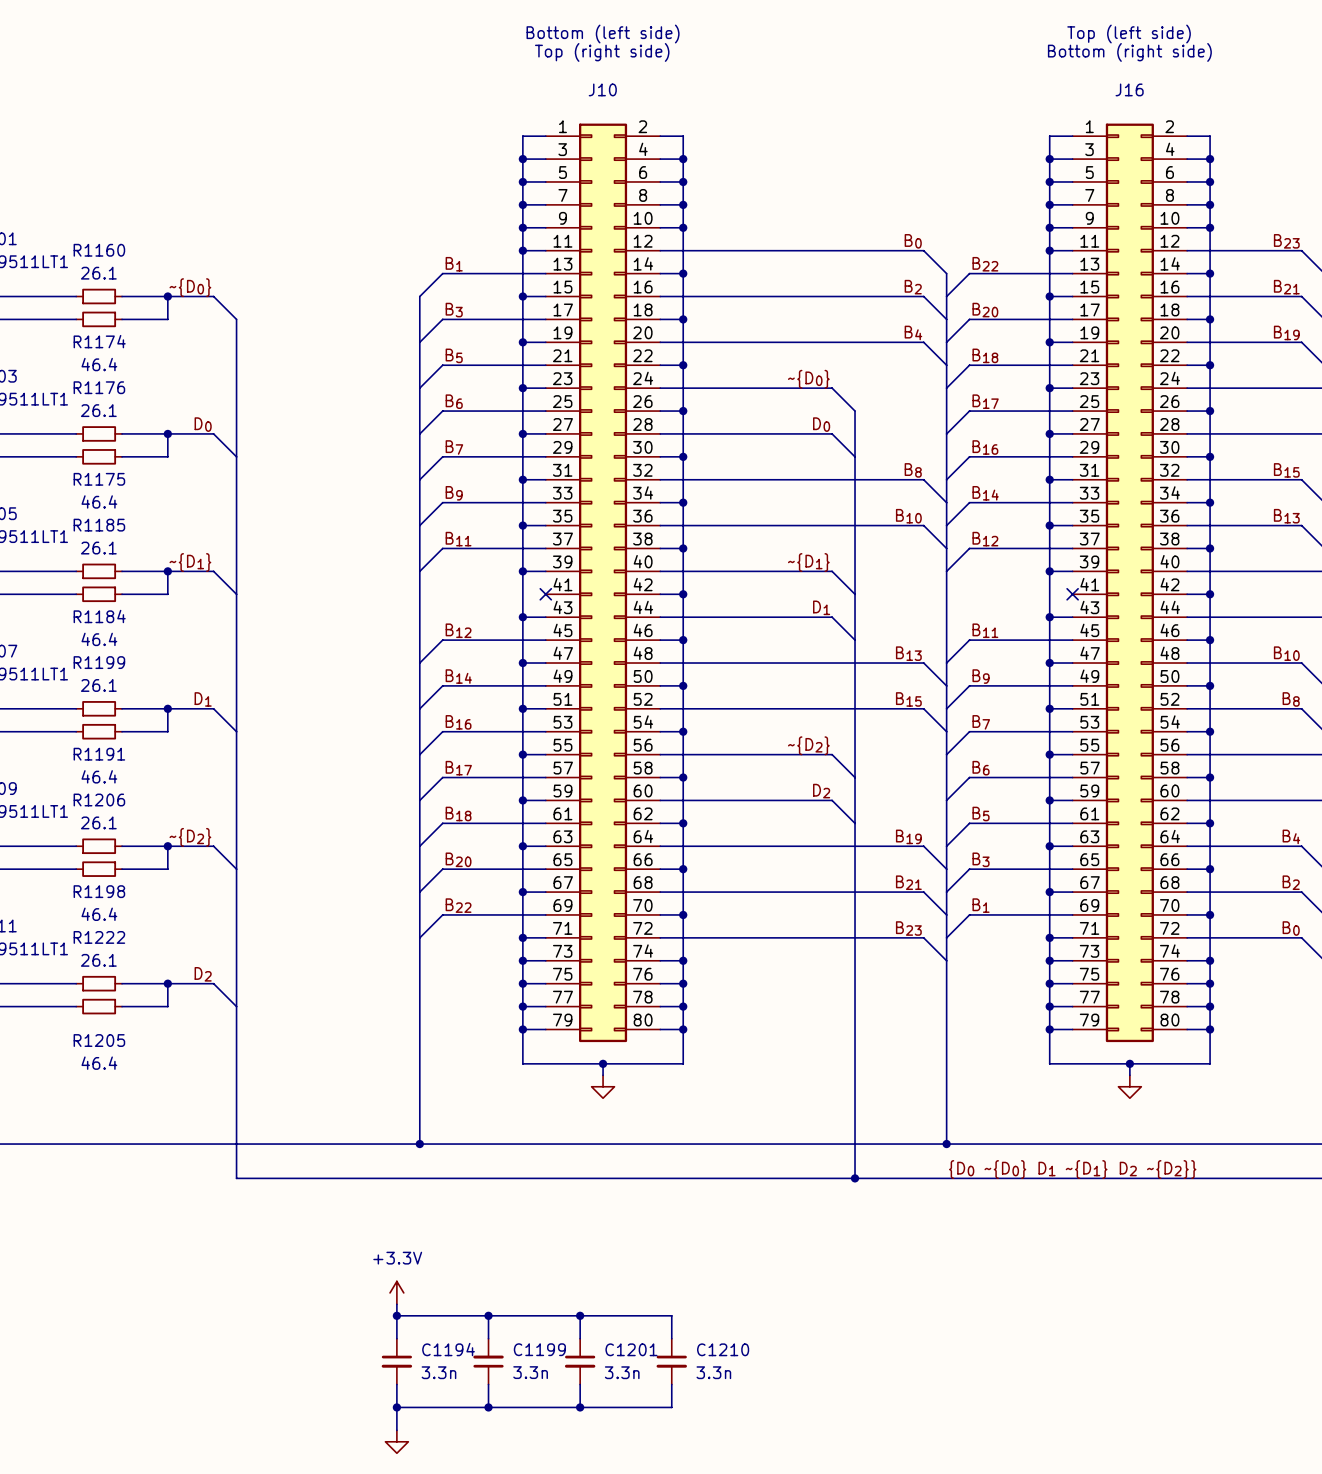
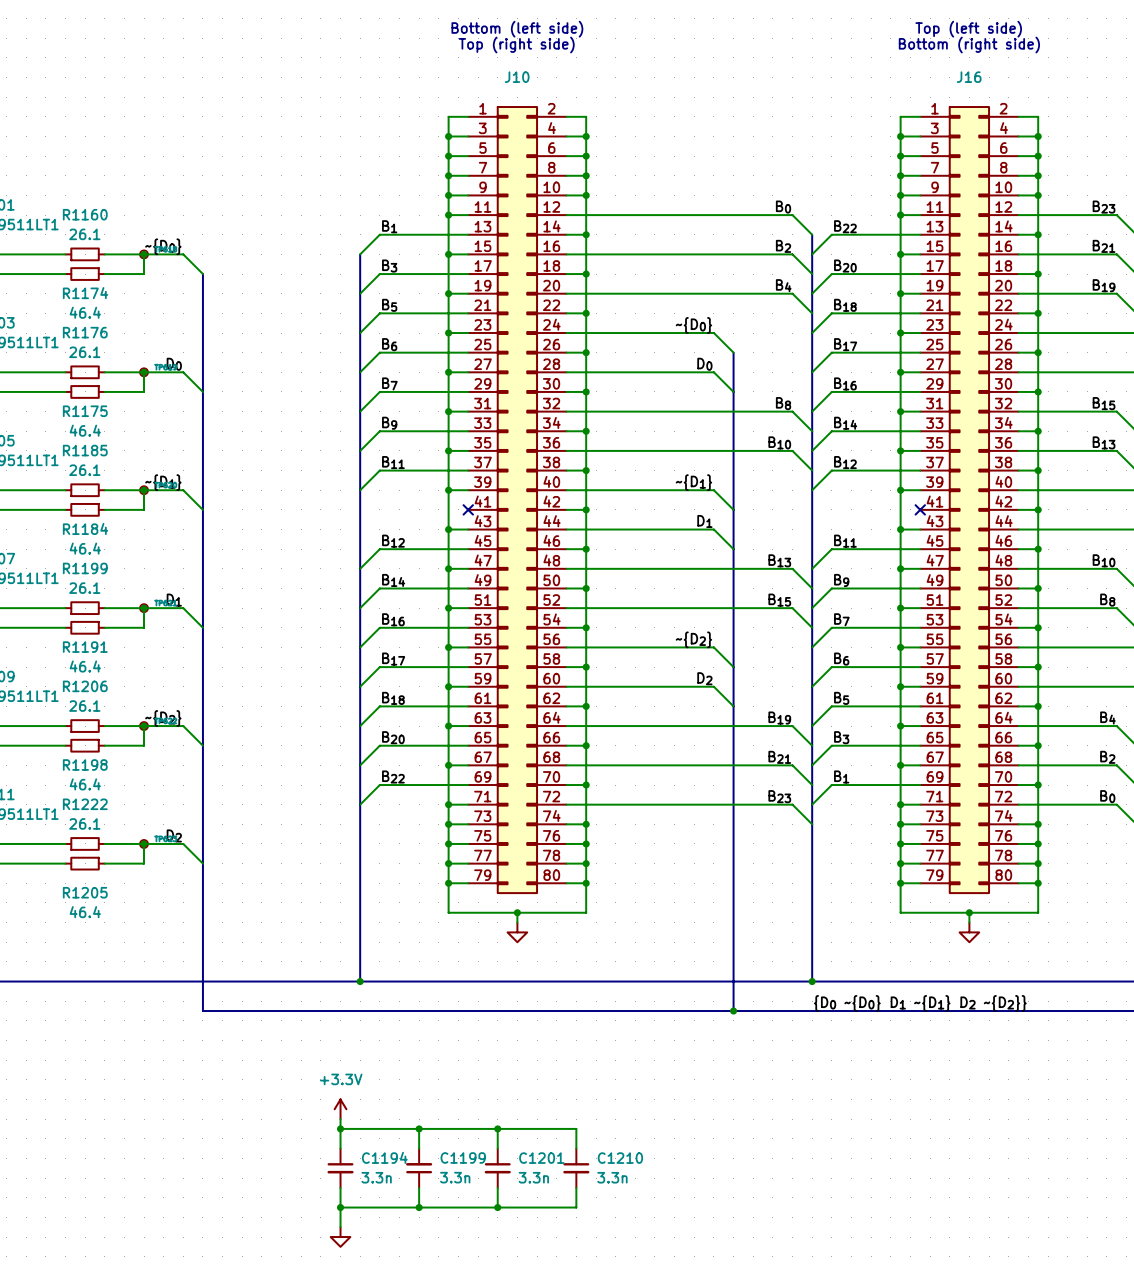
part: none -> (144, 254)
part: none -> (144, 372)
part: none -> (144, 490)
part: none -> (144, 608)
part: none -> (144, 726)
part: none -> (144, 843)

